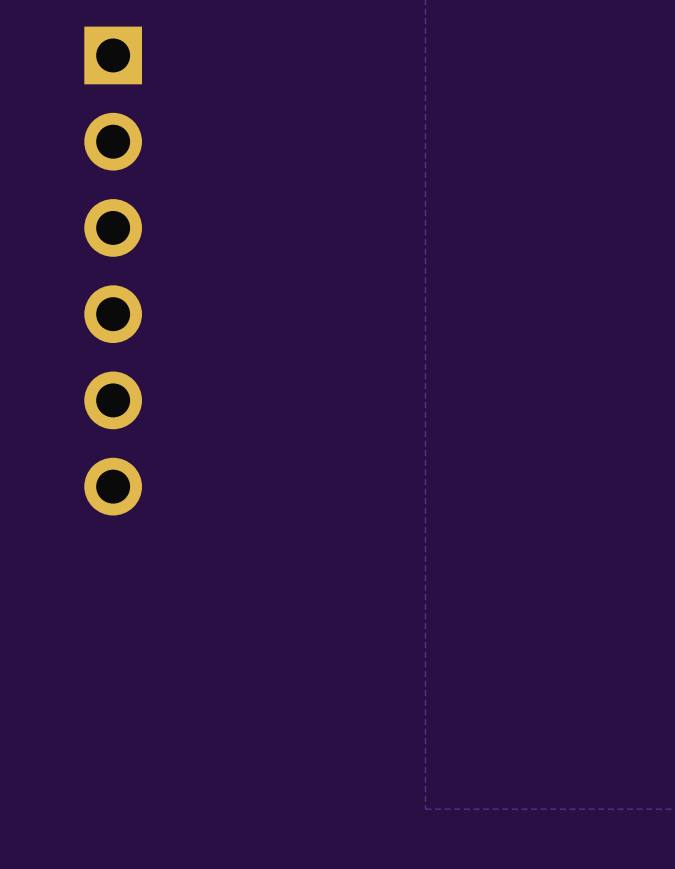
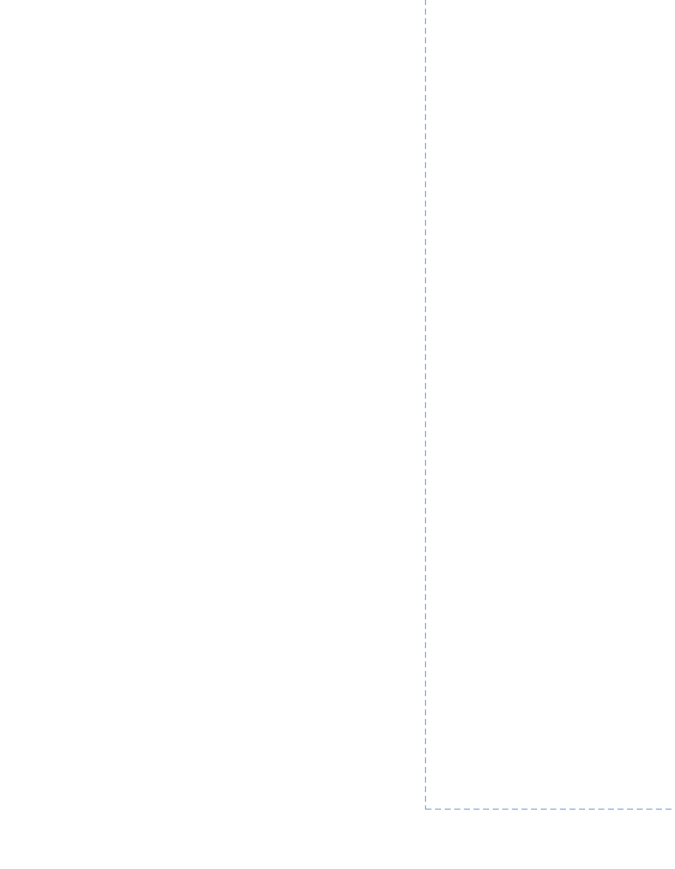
part: (113, 271) -> none

